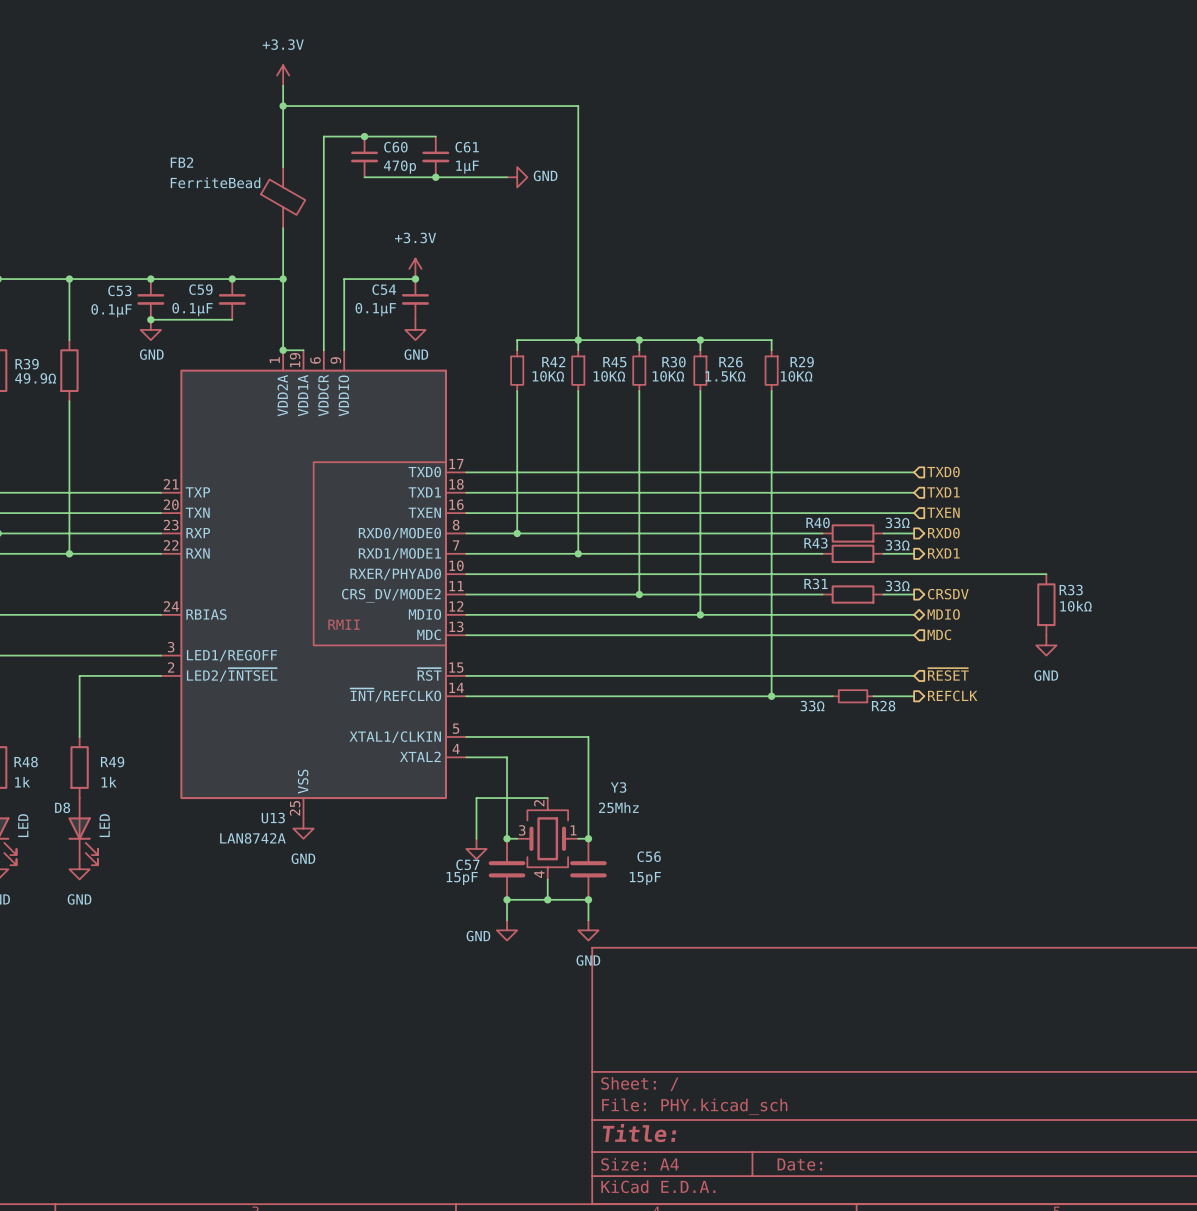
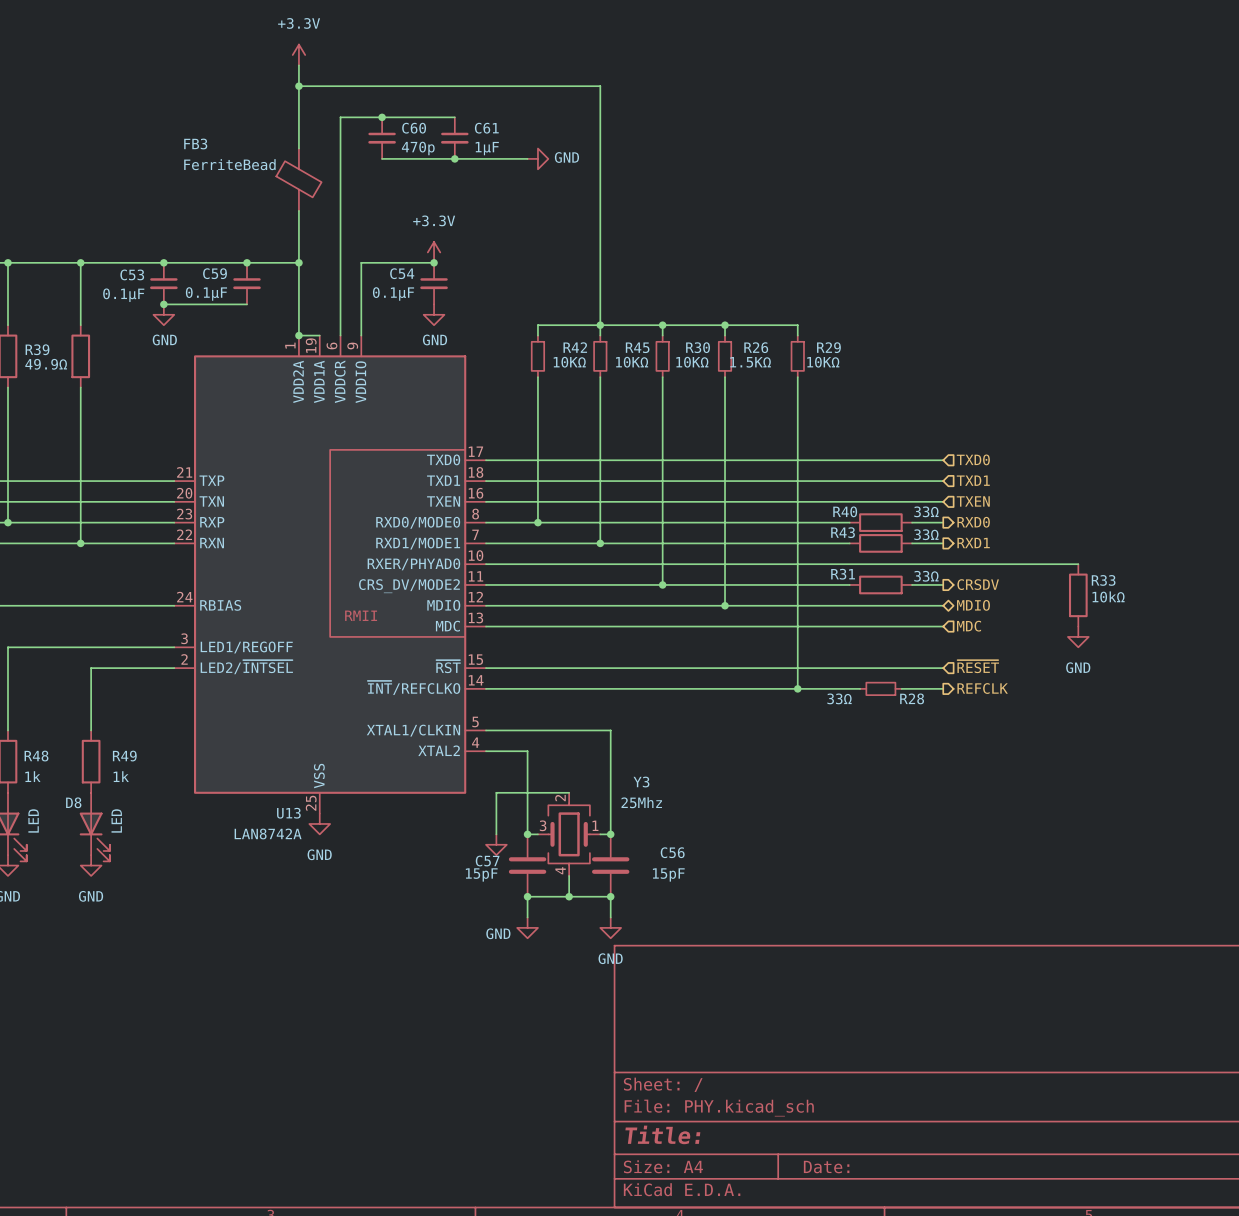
FB2 name: FB2 (181, 162) -> FB3 (195, 143)

